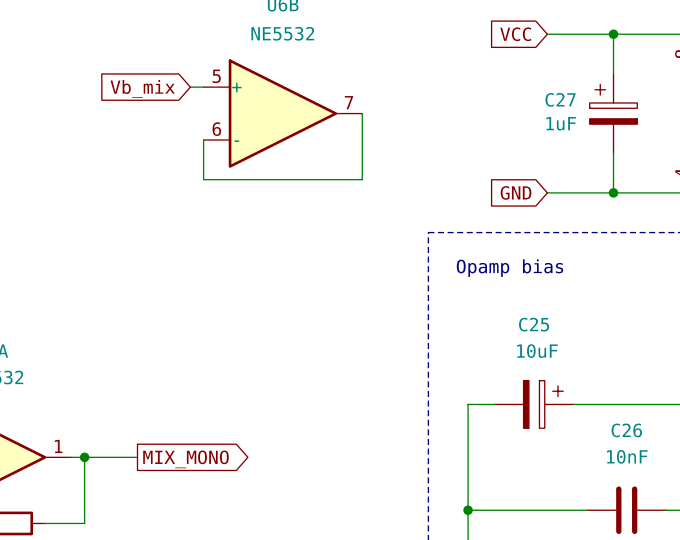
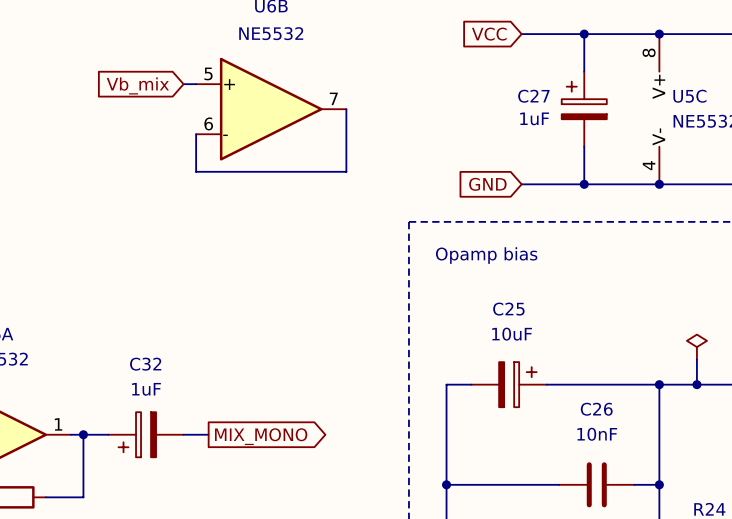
C32: none -> 1uF (146, 434)
global label position: MIX_MONO (186, 459) -> MIX_MONO (261, 436)

